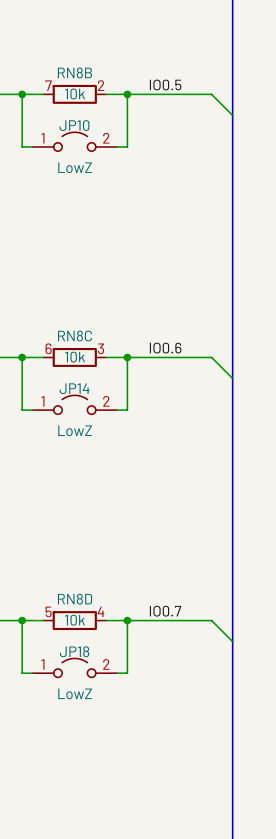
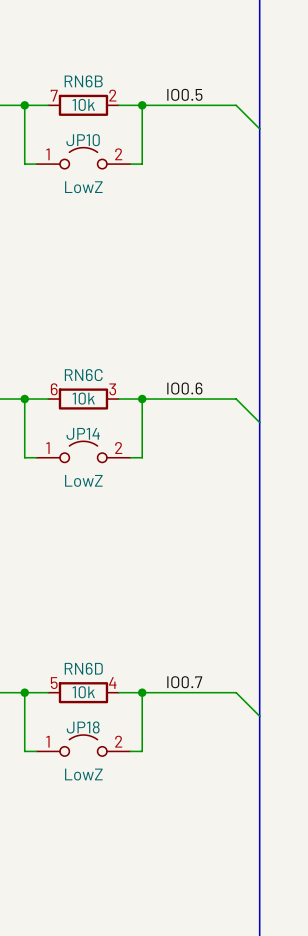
RN8B name: RN8B (74, 72) -> RN6B (83, 81)
RN8C name: RN8C (75, 336) -> RN6C (83, 375)
RN8D name: RN8D (75, 599) -> RN6D (83, 668)

